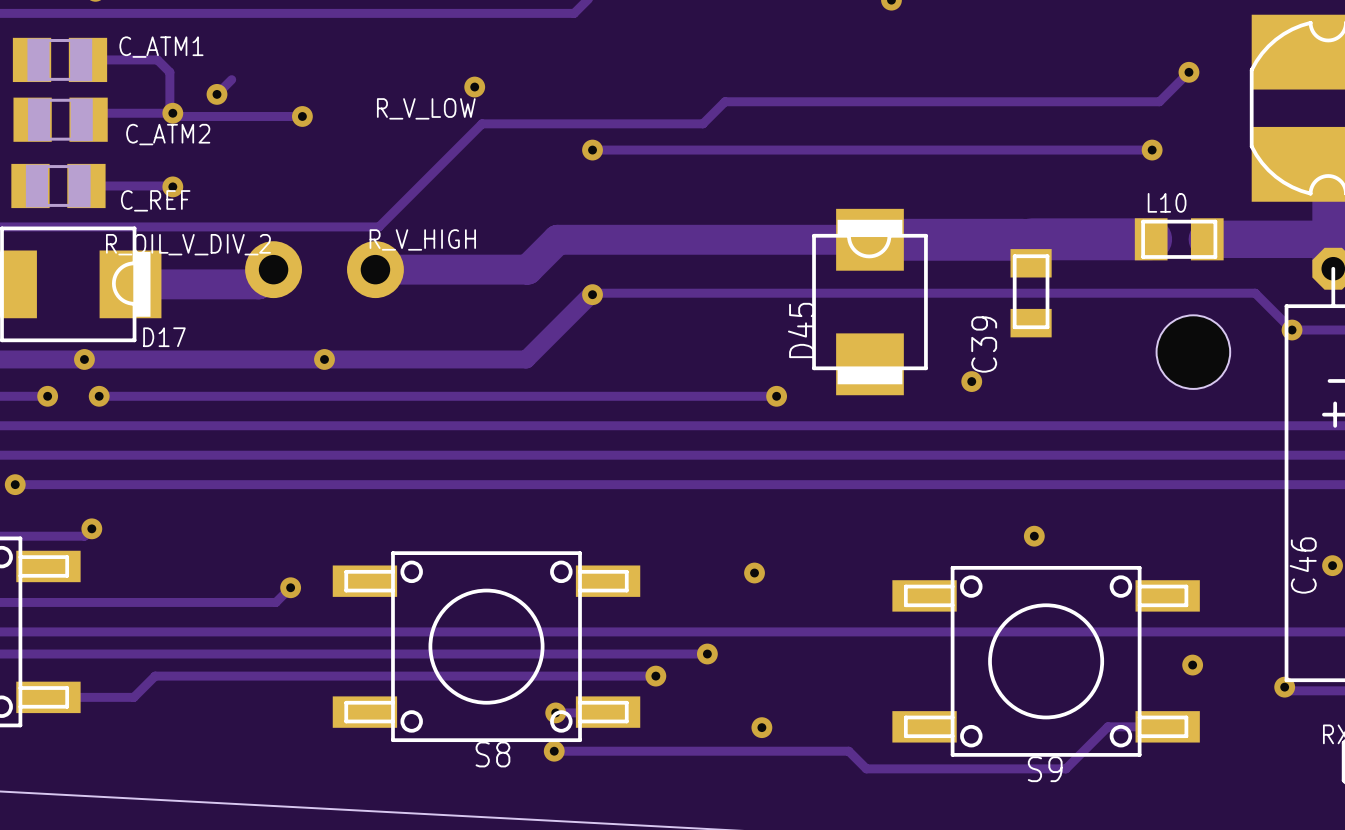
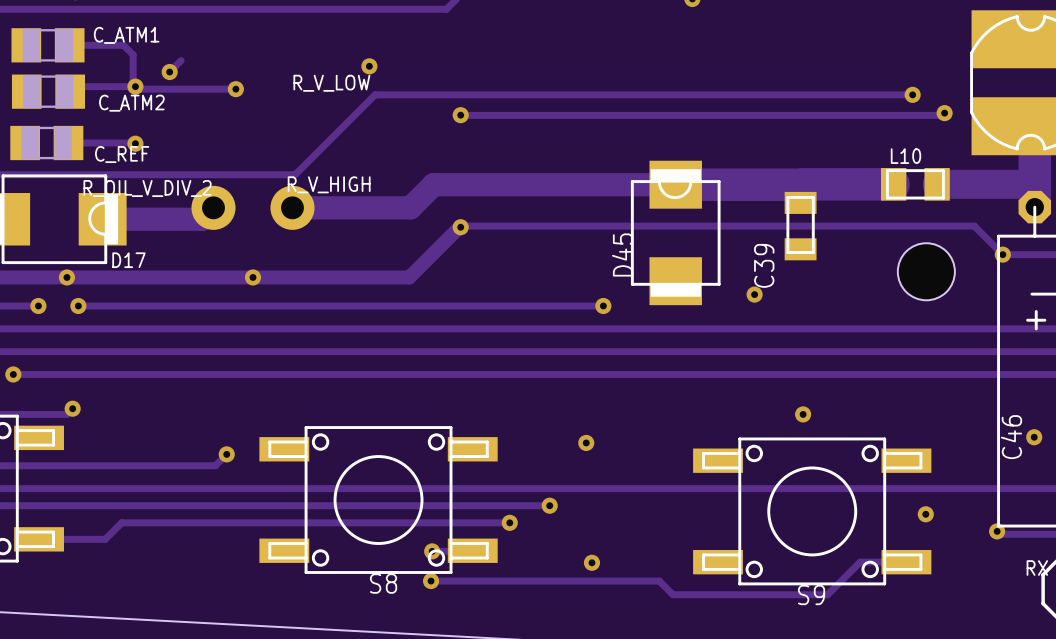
track: (1188, 72) (1159, 101) (725, 101) (702, 123) -> (912, 94) (546, 94)
via: (1188, 72) -> none
via: none -> (912, 94)
via: none -> (944, 113)
track: (592, 150) (1152, 150) -> (460, 115) (942, 115) (944, 113)
via: (1152, 150) -> none

